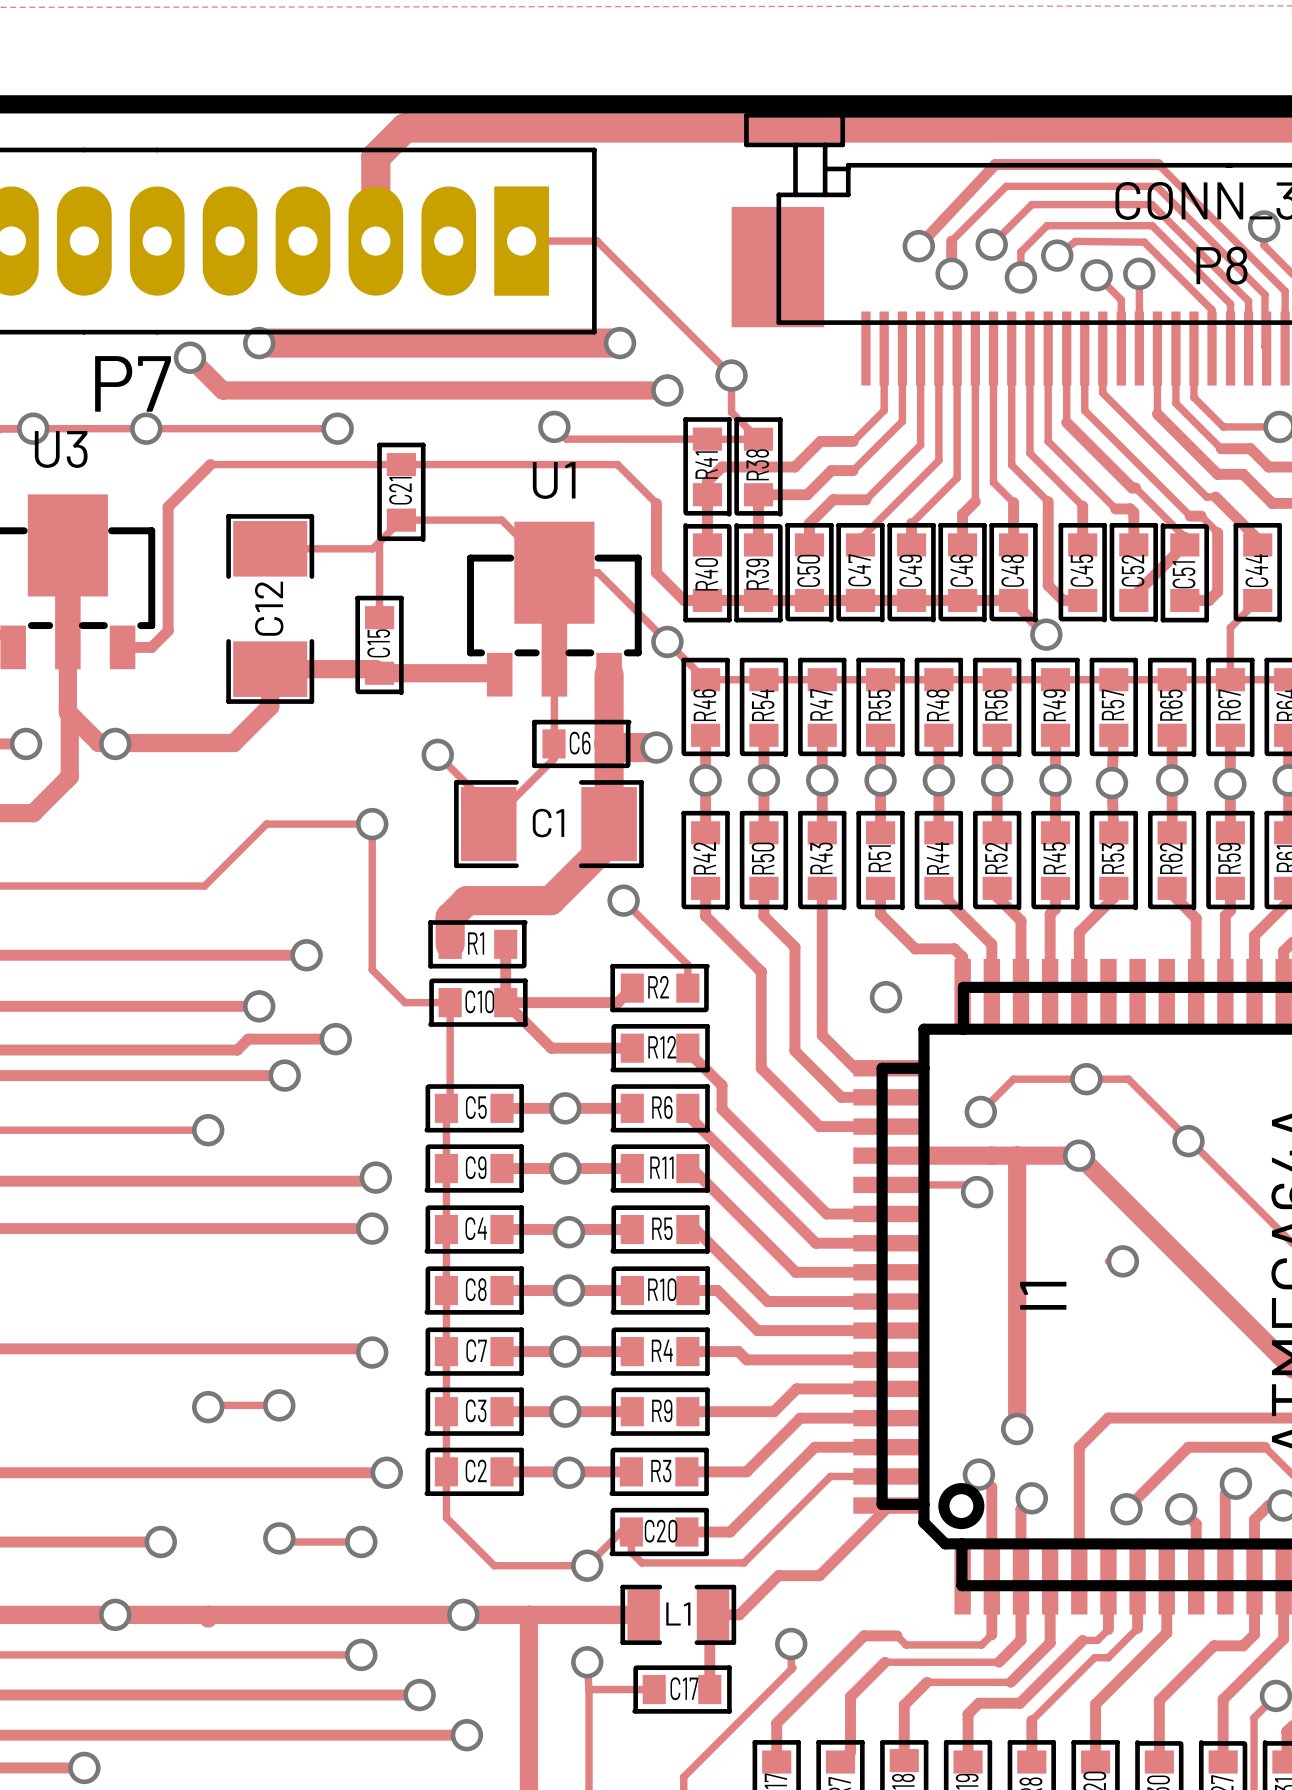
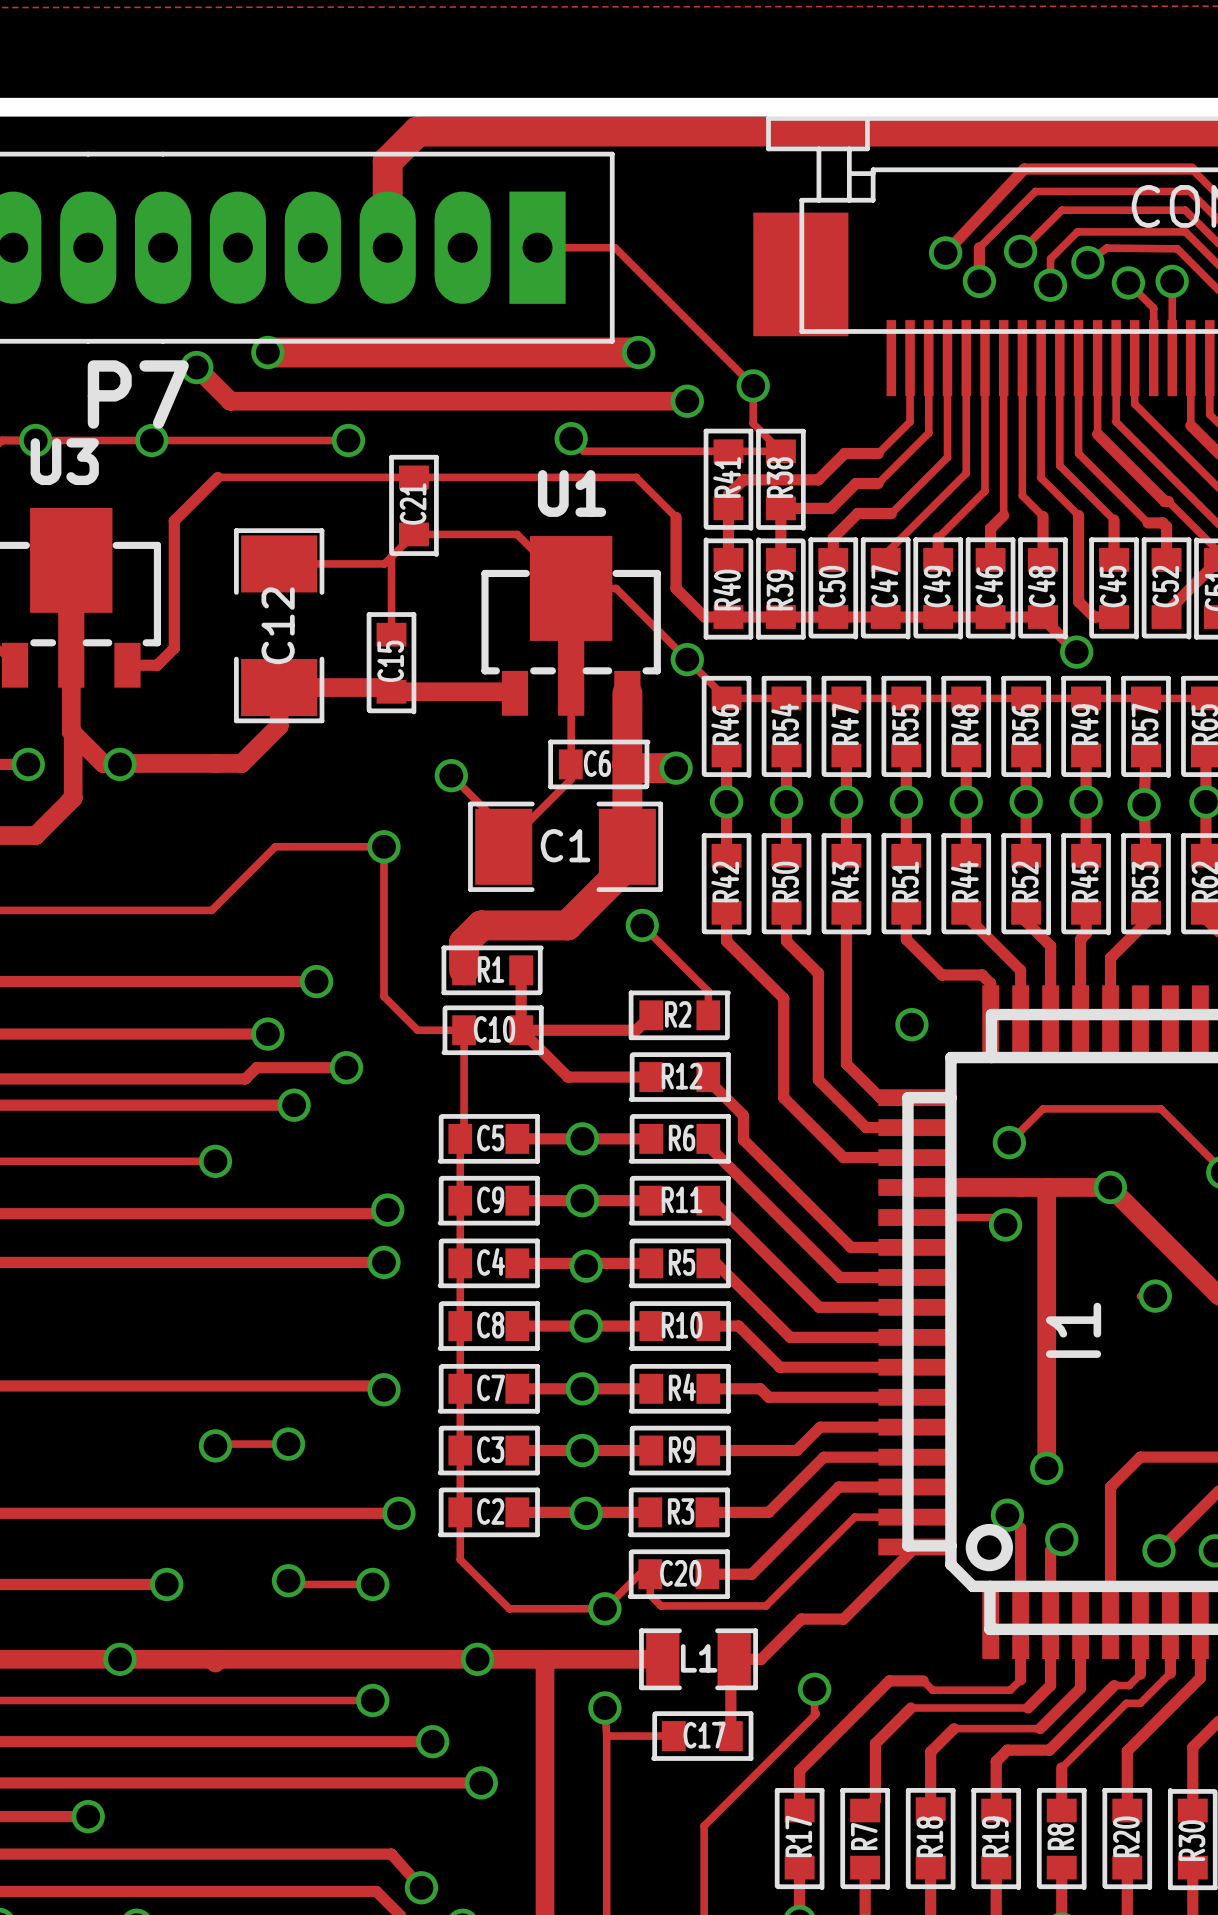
via: (1086, 1079) -> none

